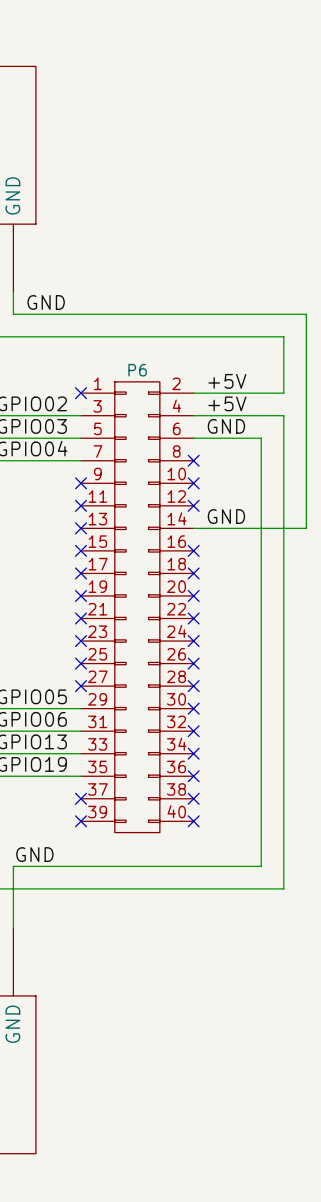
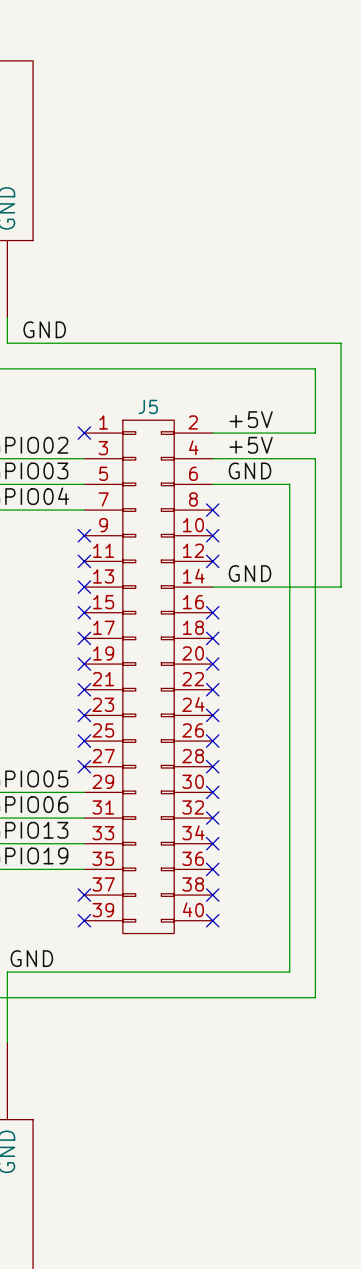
P6 name: P6 (137, 370) -> J5 (148, 406)

